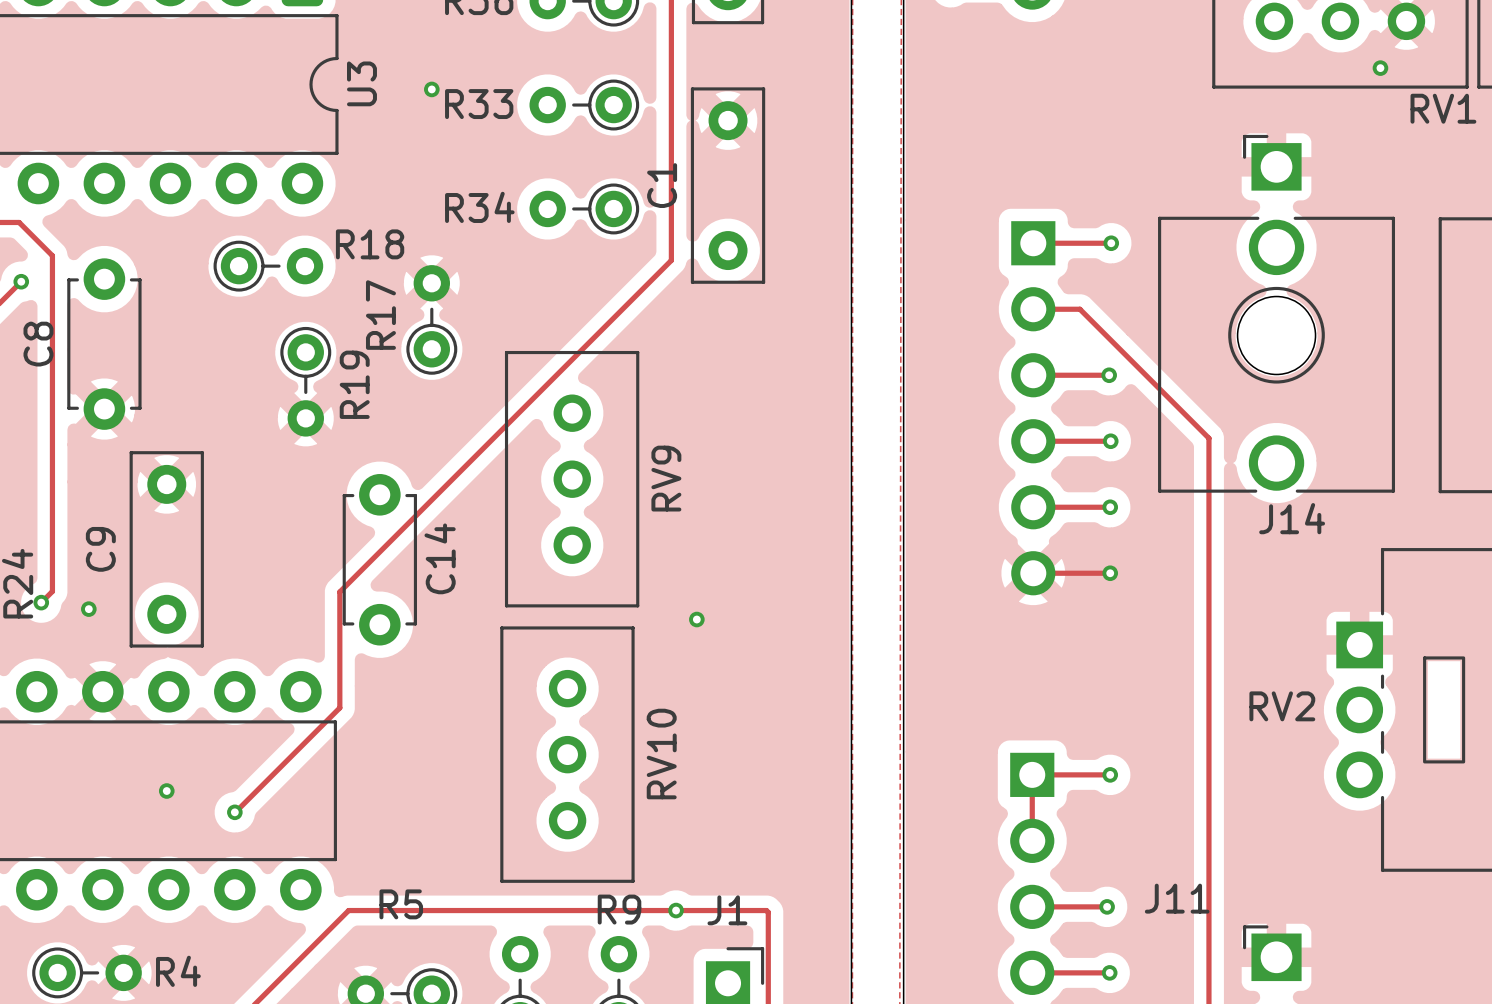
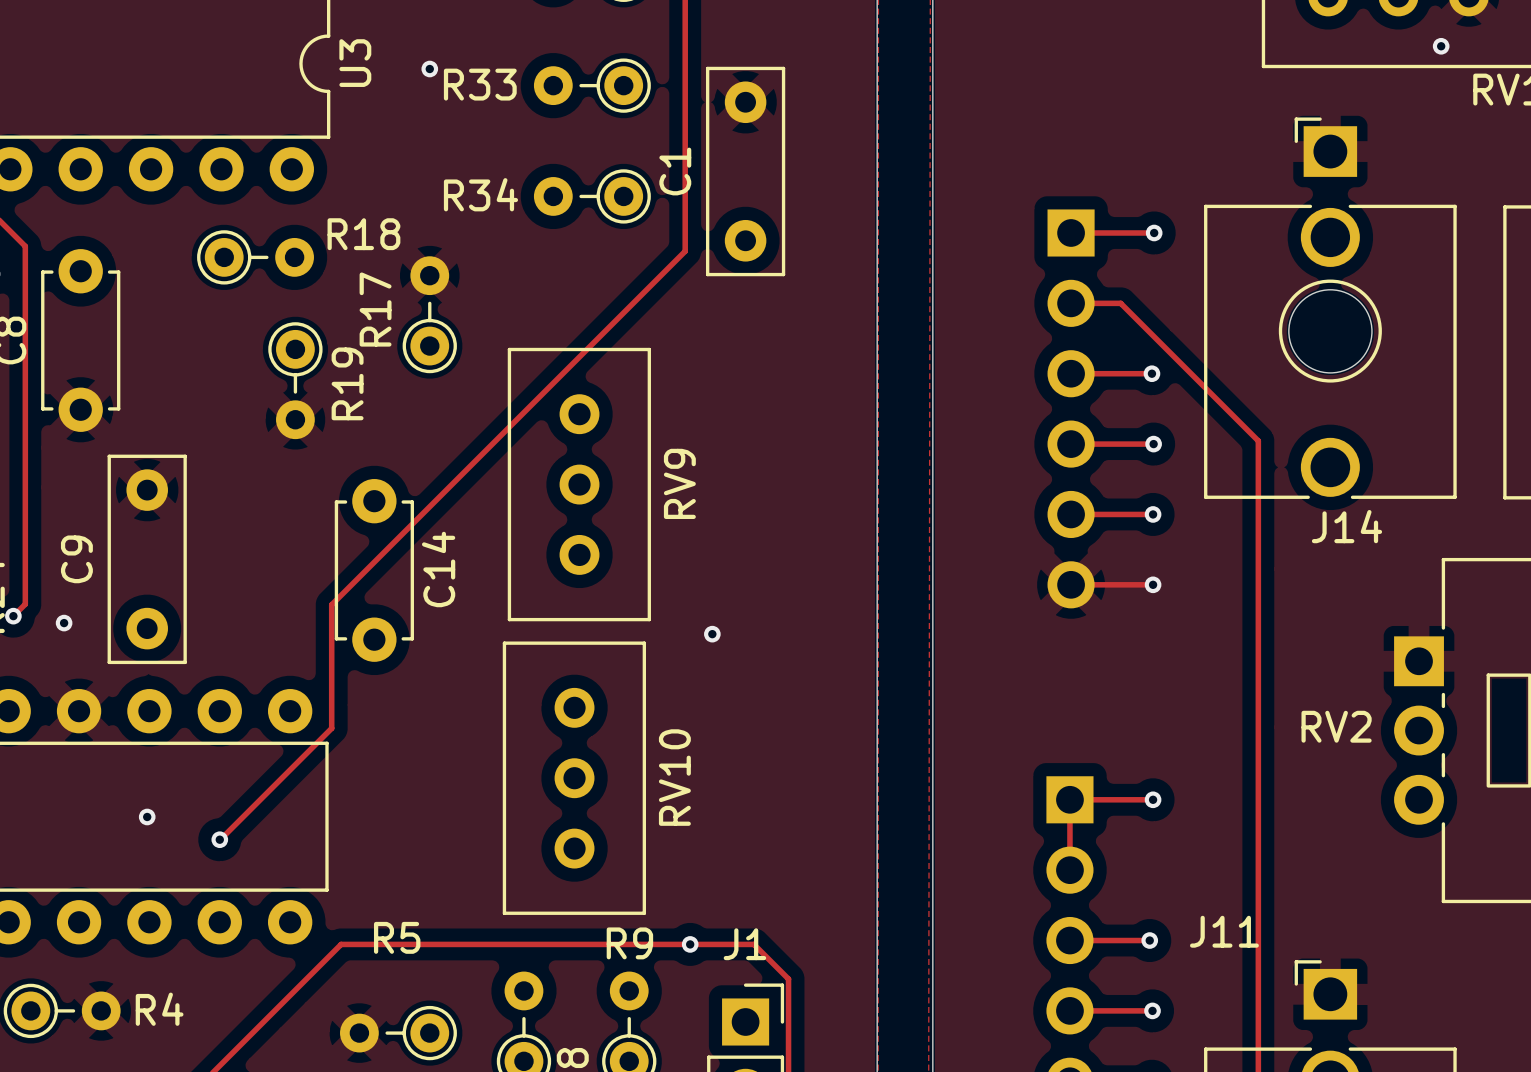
track: (735, 910) (766, 910) (768, 912) (768, 943) -> (753, 944) (788, 979)

